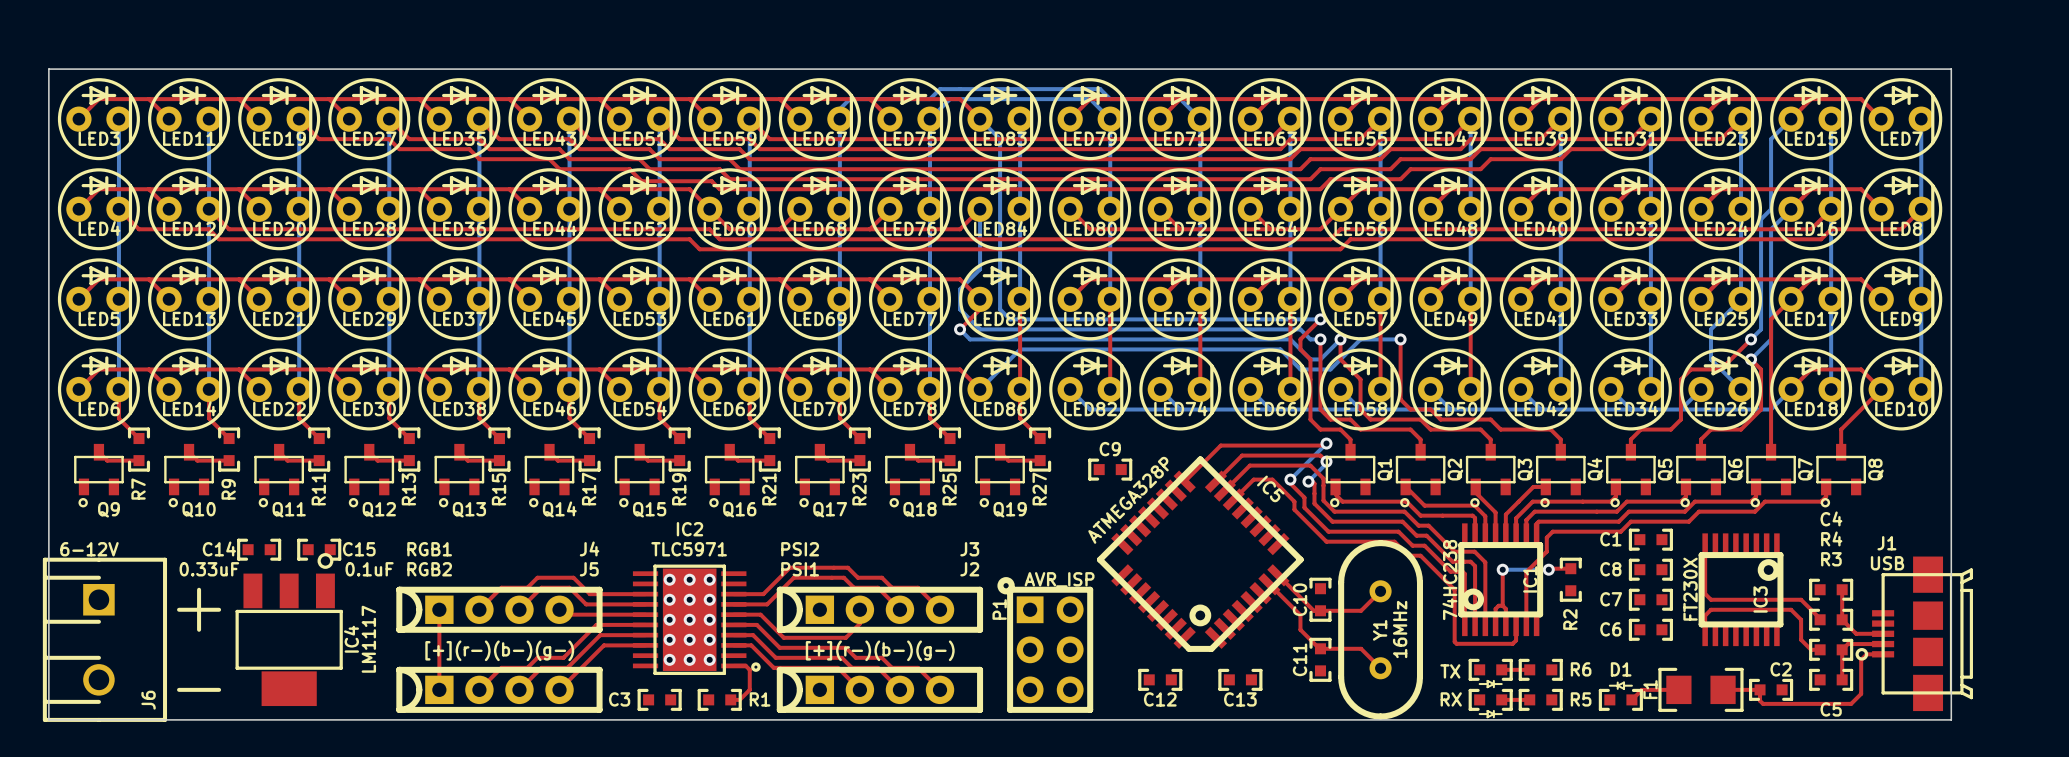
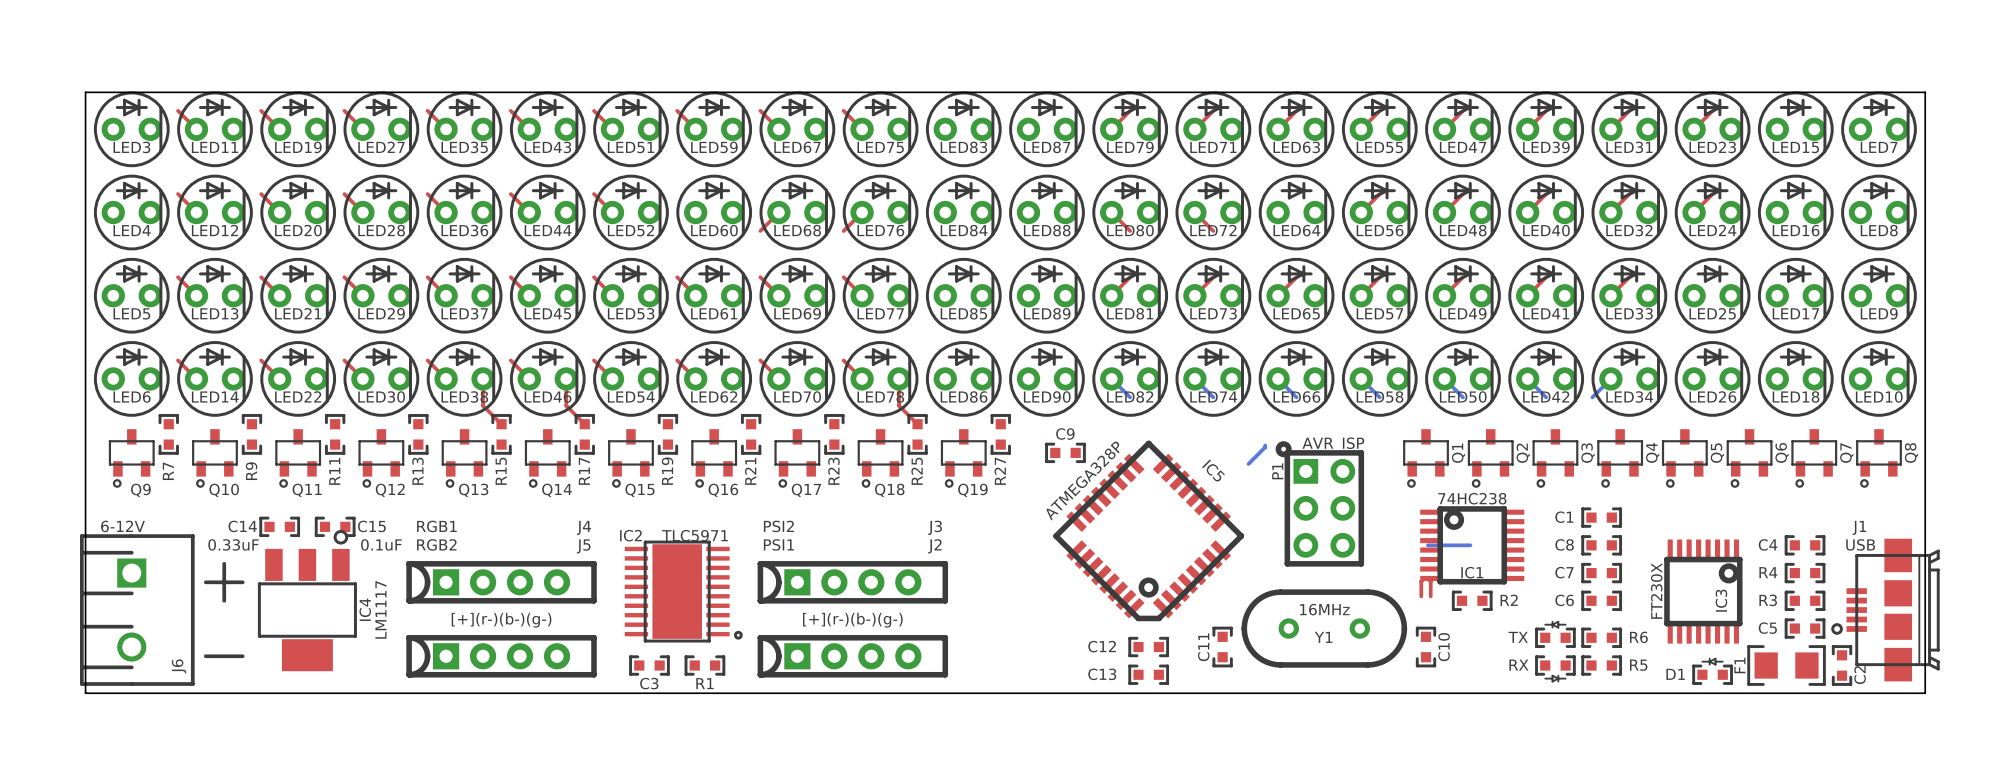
board edge: (48, 79) (48, 69) (1951, 69) (1951, 719) (48, 719) -> (85, 92) (1925, 92) (1925, 693) (85, 693) (85, 684)
top track: (78, 119) (98, 99) (960, 99) (980, 119) -> none
bottom track: (118, 119) (118, 389) -> none
bottom track: (209, 119) (209, 389) -> none
top track: (299, 119) (319, 139) (389, 139) (399, 149) (469, 149) (479, 159) (549, 159) (559, 169) (629, 169) (641, 181) (711, 181) (719, 189) (1320, 189) (1330, 179) (1400, 179) (1410, 169) (1480, 169) (1490, 159) (1560, 159) (1570, 149) (1640, 149) (1650, 139) (1721, 139) (1741, 119) -> none
bottom track: (299, 119) (299, 389) -> none
top track: (389, 119) (409, 139) (479, 139) (489, 149) (559, 149) (569, 159) (639, 159) (649, 169) (719, 169) (729, 179) (1310, 179) (1320, 169) (1390, 169) (1400, 159) (1470, 159) (1480, 149) (1550, 149) (1560, 139) (1630, 139) (1650, 119) -> none
bottom track: (389, 119) (389, 389) -> none
top track: (479, 119) (499, 139) (569, 139) (579, 149) (649, 149) (659, 159) (729, 159) (739, 169) (1300, 169) (1310, 159) (1380, 159) (1390, 149) (1460, 149) (1470, 139) (1540, 139) (1560, 119) -> none
bottom track: (479, 119) (479, 389) -> none
top track: (569, 119) (589, 139) (659, 139) (669, 149) (739, 149) (749, 159) (1290, 159) (1300, 149) (1370, 149) (1380, 139) (1450, 139) (1470, 119) -> none
bottom track: (569, 119) (569, 389) -> none
top track: (659, 119) (679, 139) (749, 139) (759, 149) (1280, 149) (1290, 139) (1360, 139) (1380, 119) -> none
bottom track: (659, 119) (659, 389) -> none
top track: (749, 119) (769, 139) (1270, 139) (1290, 119) -> none
bottom track: (749, 119) (749, 389) -> none
bottom track: (980, 119) (1000, 139) (1000, 309) (1010, 319) (1320, 319) -> none
bottom track: (1020, 119) (1020, 299) -> none
top track: (1070, 119) (1090, 99) (1861, 99) (1881, 119) -> none
bottom track: (1290, 119) (1290, 299) -> none
bottom track: (1380, 119) (1380, 299) -> none
bottom track: (1470, 119) (1470, 299) -> none
bottom track: (1560, 119) (1560, 389) -> none
bottom track: (1650, 119) (1650, 389) -> none
bottom track: (1741, 119) (1741, 299) (1710, 329) (1710, 359) (1741, 389) -> none
bottom track: (1791, 119) (1771, 139) (1771, 209) (1761, 219) (1761, 329) (1751, 339) -> none
bottom track: (1831, 119) (1831, 389) -> none
bottom track: (1921, 119) (1921, 389) -> none
LED7: none -> (1878, 129)
LED79 name: LED79 (1090, 138) -> LED87 (1047, 147)
LED71 name: LED71 (1180, 138) -> LED79 (1130, 147)
LED63 name: LED63 (1270, 138) -> LED71 (1213, 147)
LED55 name: LED55 (1360, 138) -> LED63 (1296, 147)
LED47 name: LED47 (1451, 138) -> LED55 (1379, 147)
LED39 name: LED39 (1541, 138) -> LED47 (1463, 147)
LED31 name: LED31 (1631, 138) -> LED39 (1546, 147)
LED23 name: LED23 (1721, 138) -> LED31 (1629, 147)
LED15 name: LED15 (1811, 138) -> LED23 (1712, 147)
LED7 name: LED7 (1901, 138) -> LED15 (1795, 147)
top track: (78, 209) (98, 189) (689, 189) (729, 229) (960, 229) (980, 209) -> none
top track: (118, 209) (138, 229) (209, 229) (219, 239) (689, 239) (699, 249) (1340, 249) (1350, 239) (1821, 239) (1831, 229) (1901, 229) (1921, 209) -> none
top track: (209, 209) (229, 229) (709, 229) (719, 239) (1330, 239) (1340, 229) (1811, 229) (1831, 209) -> none
bottom track: (980, 209) (980, 269) (960, 289) (960, 309) (980, 329) (1300, 329) (1310, 339) (1320, 339) -> none
top track: (1070, 209) (1090, 229) (1320, 229) (1360, 189) (1861, 189) (1881, 209) -> none
bottom track: (1791, 209) (1771, 229) (1771, 339) (1751, 359) -> none
LED8: none -> (1878, 212)
LED80 name: LED80 (1090, 228) -> LED88 (1047, 230)
LED72 name: LED72 (1180, 228) -> LED80 (1130, 230)
LED64 name: LED64 (1271, 228) -> LED72 (1213, 230)
LED56 name: LED56 (1360, 228) -> LED64 (1296, 230)
LED48 name: LED48 (1450, 228) -> LED56 (1380, 230)
LED40 name: LED40 (1541, 228) -> LED48 (1463, 230)
LED32 name: LED32 (1631, 228) -> LED40 (1546, 230)
LED24 name: LED24 (1721, 228) -> LED32 (1629, 230)
LED16 name: LED16 (1811, 228) -> LED24 (1712, 230)
LED8 name: LED8 (1901, 228) -> LED16 (1796, 230)
top track: (1811, 279) (1771, 319) (1771, 452) -> none
top track: (78, 299) (98, 279) (960, 279) (980, 299) (980, 309) (960, 329) -> none
top track: (1020, 299) (1020, 418) (1040, 438) -> none
top track: (1070, 299) (1090, 279) (1861, 279) (1881, 299) -> none
top track: (1110, 299) (1110, 389) -> none
bottom track: (1110, 299) (1110, 119) (1090, 99) (950, 99) (929, 119) (929, 389) -> none
top track: (1200, 299) (1200, 389) -> none
bottom track: (1200, 299) (1200, 119) (1180, 99) (1110, 99) (1100, 89) (940, 89) (929, 99) (849, 99) (839, 109) (839, 389) -> none
top track: (1290, 299) (1290, 389) -> none
top track: (1380, 299) (1380, 389) -> none
top track: (1470, 299) (1470, 389) -> none
LED9: none -> (1878, 295)
LED81 name: LED81 (1090, 318) -> LED89 (1047, 313)
LED73 name: LED73 (1180, 318) -> LED81 (1130, 313)
LED65 name: LED65 (1270, 318) -> LED73 (1213, 313)
LED57 name: LED57 (1361, 318) -> LED65 (1296, 313)
LED49 name: LED49 (1450, 318) -> LED57 (1379, 313)
LED41 name: LED41 (1541, 318) -> LED49 (1463, 313)
LED33 name: LED33 (1631, 318) -> LED41 (1546, 313)
LED25 name: LED25 (1721, 318) -> LED33 (1629, 313)
LED17 name: LED17 (1811, 318) -> LED25 (1712, 313)
LED9 name: LED9 (1901, 318) -> LED17 (1795, 313)
top track: (1320, 319) (1300, 339) (1300, 349) (1310, 359) (1310, 419) (1320, 429) (1340, 429) (1350, 439) (1350, 452) -> none
via: (1320, 319) -> none
bottom track: (960, 329) (970, 339) (1290, 339) (1310, 359) (1320, 359) (1340, 339) -> none
via: (960, 329) -> none
top track: (1320, 339) (1320, 409) (1330, 419) (1350, 419) (1360, 429) (1410, 429) (1420, 439) (1420, 452) -> none
via: (1320, 339) -> none
top track: (1340, 339) (1340, 359) (1360, 379) (1360, 409) (1370, 419) (1420, 419) (1430, 429) (1480, 429) (1490, 439) (1490, 452) -> none
via: (1340, 339) -> none
top track: (1400, 339) (1400, 399) (1410, 409) (1430, 409) (1440, 419) (1490, 419) (1500, 429) (1550, 429) (1560, 439) (1560, 452) -> none
bottom track: (1400, 339) (1360, 339) (1330, 369) (1300, 369) (1280, 349) (1020, 349) (980, 389) -> none
via: (1400, 339) -> none
top track: (1751, 339) (1721, 369) (1690, 369) (1680, 379) (1680, 419) (1670, 429) (1640, 429) (1630, 439) (1630, 452) -> none
via: (1751, 339) -> none
top track: (1751, 359) (1761, 369) (1761, 409) (1741, 429) (1710, 429) (1700, 439) (1700, 452) -> none
via: (1751, 359) -> none
top track: (78, 389) (98, 369) (960, 369) (980, 389) -> none
top track: (118, 389) (118, 418) (138, 438) -> none
top track: (209, 389) (209, 418) (229, 438) -> none
top track: (299, 389) (299, 418) (319, 438) -> none
top track: (389, 389) (389, 418) (409, 438) -> none
top track: (659, 389) (659, 418) (679, 438) -> none
top track: (749, 389) (749, 418) (769, 438) -> none
top track: (839, 389) (839, 418) (859, 438) -> none
bottom track: (1070, 389) (1090, 409) (1771, 409) (1791, 389) -> none
top track: (1791, 389) (1811, 369) (1861, 369) (1881, 389) (1841, 429) (1841, 452) -> none
LED10: none -> (1878, 378)
LED74 name: LED74 (1180, 408) -> LED82 (1130, 397)
LED42 name: LED42 (1541, 408) -> LED50 (1463, 397)
LED34 name: LED34 (1631, 408) -> LED42 (1546, 396)
LED82 name: LED82 (1090, 409) -> LED90 (1047, 397)
LED66 name: LED66 (1270, 409) -> LED74 (1213, 397)
LED58 name: LED58 (1360, 409) -> LED66 (1296, 397)
LED50 name: LED50 (1450, 409) -> LED58 (1380, 397)
LED26 name: LED26 (1721, 409) -> LED34 (1629, 397)
LED18 name: LED18 (1811, 409) -> LED26 (1712, 397)
LED10 name: LED10 (1901, 409) -> LED18 (1796, 397)
top track: (1326, 443) (1324, 445) (1220, 445) (1184, 481) -> none
bottom track: (1326, 443) (1290, 479) -> none
via: (1326, 443) -> none
top track: (98, 452) (107, 460) (138, 460) -> none
top track: (189, 452) (197, 460) (229, 460) -> none
top track: (279, 452) (287, 460) (319, 460) -> none
top track: (369, 452) (377, 460) (409, 460) -> none
top track: (459, 452) (467, 460) (499, 460) -> none
top track: (549, 452) (557, 460) (589, 460) -> none
top track: (639, 452) (647, 460) (679, 460) -> none
top track: (729, 452) (738, 460) (769, 460) -> none
top track: (819, 452) (828, 460) (859, 460) -> none
top track: (909, 452) (918, 460) (950, 460) -> none
top track: (1000, 452) (1008, 460) (1040, 460) -> none
top track: (1326, 461) (1320, 455) (1242, 455) (1215, 481) -> none
via: (1326, 461) -> none
Q1 position: (1350, 475) -> (1426, 458)
Q2 position: (1420, 475) -> (1490, 458)
Q3 position: (1490, 475) -> (1555, 458)
Q4 position: (1560, 475) -> (1620, 458)
Q5 position: (1630, 475) -> (1684, 458)
Q6 position: (1700, 475) -> (1749, 458)
Q7 position: (1771, 475) -> (1814, 458)
Q8 position: (1841, 475) -> (1878, 458)
top track: (1290, 479) (1290, 483) (1304, 497) (1304, 507) (1328, 531) (1398, 531) (1412, 545) (1424, 545) (1450, 571) (1462, 571) (1464, 573) (1464, 625) -> none
via: (1290, 479) -> none
top track: (1308, 481) (1314, 483) (1314, 503) (1332, 521) (1402, 521) (1416, 535) (1426, 535) (1452, 561) (1470, 561) (1475, 566) (1475, 625) -> none
via: (1308, 481) -> none
top track: (1335, 486) (1336, 495) (1342, 501) (1406, 501) (1420, 515) (1472, 515) (1475, 518) (1475, 534) -> none
top track: (1405, 486) (1424, 505) (1474, 505) (1485, 516) (1485, 534) -> none
top track: (1475, 486) (1475, 492) (1495, 512) (1495, 534) -> none
top track: (1545, 486) (1533, 486) (1505, 514) (1505, 534) -> none
top track: (1615, 486) (1615, 496) (1610, 501) (1532, 501) (1516, 518) (1516, 534) -> none
top track: (1685, 486) (1685, 496) (1680, 501) (1626, 501) (1616, 511) (1534, 511) (1526, 520) (1526, 534) -> none
top track: (1756, 486) (1756, 496) (1751, 501) (1694, 501) (1684, 511) (1628, 511) (1618, 521) (1538, 521) (1536, 523) (1536, 534) -> none
top track: (1826, 486) (1826, 496) (1821, 501) (1765, 501) (1755, 511) (1698, 511) (1688, 521) (1630, 521) (1620, 531) (1552, 531) (1546, 537) (1546, 551) (1526, 572) (1526, 625) -> none
top track: (1224, 490) (1249, 465) (1310, 465) (1323, 478) (1323, 500) (1334, 511) (1404, 511) (1418, 525) (1428, 525) (1454, 551) (1474, 551) (1485, 562) (1485, 625) -> none
top track: (1233, 499) (1253, 479) (1272, 479) (1294, 501) (1294, 509) (1326, 541) (1394, 541) (1408, 555) (1420, 555) (1454, 589) (1454, 641) (1456, 643) (1512, 643) (1516, 640) (1516, 625) -> none
C4 name position: C4 (1831, 518) -> C4 (1768, 544)
IC2 name position: IC2 (689, 529) -> IC2 (630, 535)
R4 name position: R4 (1831, 538) -> R4 (1768, 572)
C1 position: (1650, 539) -> (1601, 517)
top track: (1705, 544) (1705, 593) (1710, 599) (1801, 599) (1820, 619) -> none
IC2 value position: TLC5971 (689, 549) -> TLC5971 (694, 535)
R3 name position: R3 (1831, 559) -> R3 (1768, 600)
top track: (1570, 568) (1548, 569) -> none
top track: (1502, 569) (1502, 605) -> none
via: (1502, 569) -> none
via: (1548, 569) -> none
C8 position: (1650, 569) -> (1601, 545)
top track: (1278, 575) (1313, 610) (1361, 610) (1380, 591) -> none
via: (669, 579) -> none
via: (689, 579) -> none
via: (709, 579) -> none
IC1 rotation: 0° (1500, 579) -> 90° clockwise (1472, 545)
R2 rotation: 0° (1570, 579) -> 90° clockwise (1472, 600)
R2 position: (1570, 579) -> (1472, 600)
top track: (1269, 584) (1300, 615) (1300, 629) (1319, 648) (1361, 648) (1380, 668) -> none
IC3 position: (1741, 589) -> (1703, 591)
C4 position: (1831, 589) -> (1805, 545)
top track: (1842, 589) (1842, 619) (1856, 633) (1883, 633) -> none
top track: (645, 594) (589, 594) (573, 577) (537, 577) (527, 587) (501, 587) (479, 609) -> none
top track: (733, 594) (763, 594) (789, 567) (847, 567) (857, 577) (881, 577) (891, 587) (917, 587) (940, 609) -> none
via: (669, 599) -> none
via: (689, 599) -> none
via: (709, 599) -> none
C10 name position: C10 (1300, 599) -> C10 (1444, 647)
C10 position: (1320, 599) -> (1426, 647)
C7 position: (1650, 599) -> (1601, 573)
top track: (645, 604) (586, 604) (569, 587) (541, 587) (519, 609) -> none
top track: (733, 604) (767, 604) (793, 577) (843, 577) (853, 587) (877, 587) (899, 609) -> none
top track: (859, 605) (859, 623) (845, 637) (783, 637) (760, 614) (733, 614) -> none
top track: (439, 609) (439, 689) -> none
top track: (559, 609) (564, 614) (645, 614) -> none
via: (669, 619) -> none
via: (689, 619) -> none
via: (709, 619) -> none
R2 name position: R2 (1570, 619) -> R2 (1509, 600)
R4 position: (1831, 619) -> (1805, 573)
top track: (645, 624) (596, 624) (563, 657) (537, 657) (527, 667) (501, 667) (479, 689) -> none
top track: (733, 624) (756, 624) (779, 647) (845, 647) (855, 657) (881, 657) (891, 667) (917, 667) (940, 689) -> none
Y1 rotation: 0° (1380, 629) -> 90° clockwise (1324, 628)
C6 position: (1650, 629) -> (1601, 600)
J1 position: (1914, 633) -> (1885, 610)
top track: (645, 635) (600, 635) (567, 667) (541, 667) (519, 689) -> none
top track: (733, 635) (753, 635) (775, 657) (841, 657) (851, 667) (877, 667) (899, 689) -> none
top track: (1705, 635) (1705, 615) (1710, 609) (1791, 609) (1801, 619) (1801, 639) (1811, 649) (1820, 649) -> none
via: (669, 639) -> none
via: (689, 639) -> none
via: (709, 639) -> none
P1 position: (1045, 644) -> (1319, 503)
top track: (1883, 644) (1847, 644) (1842, 649) (1842, 679) -> none
top track: (645, 645) (603, 645) (559, 689) -> none
top track: (733, 645) (751, 645) (773, 667) (837, 667) (859, 689) -> none
R3 position: (1831, 649) -> (1805, 600)
top track: (1883, 654) (1866, 654) (1861, 659) (1861, 693) (1851, 703) (1763, 703) (1760, 700) (1760, 689) (1724, 688) -> none
via: (669, 659) -> none
via: (689, 659) -> none
via: (709, 659) -> none
C11 position: (1320, 659) -> (1222, 647)
top track: (733, 665) (745, 665) (749, 669) (749, 689) (739, 699) (730, 699) -> none
top track: (1501, 669) (1529, 669) -> none
R6 position: (1540, 669) -> (1601, 637)
D1 name position: D1 (1621, 669) -> D1 (1675, 674)
part rotation: 0° (1490, 673) -> 180° (1555, 634)
part position: (1490, 673) -> (1555, 634)
C12 position: (1160, 679) -> (1148, 647)
C13 position: (1240, 679) -> (1148, 674)
C5 position: (1831, 679) -> (1805, 628)
top track: (1678, 689) (1641, 689) (1631, 699) -> none
F1 position: (1700, 689) -> (1786, 665)
C2 rotation: 0° (1771, 689) -> 90° clockwise (1842, 665)
C2 position: (1771, 689) -> (1842, 665)
D1 position: (1620, 696) -> (1712, 671)
C3 name position: C3 (619, 699) -> C3 (649, 683)
R1 name position: R1 (760, 699) -> R1 (704, 683)
C12 name position: C12 (1160, 699) -> C12 (1102, 646)
C13 name position: C13 (1240, 699) -> C13 (1102, 674)
top track: (1501, 699) (1529, 699) -> none
R5 position: (1540, 699) -> (1601, 665)
part position: (1490, 703) -> (1555, 668)
C5 name position: C5 (1831, 709) -> C5 (1767, 628)

